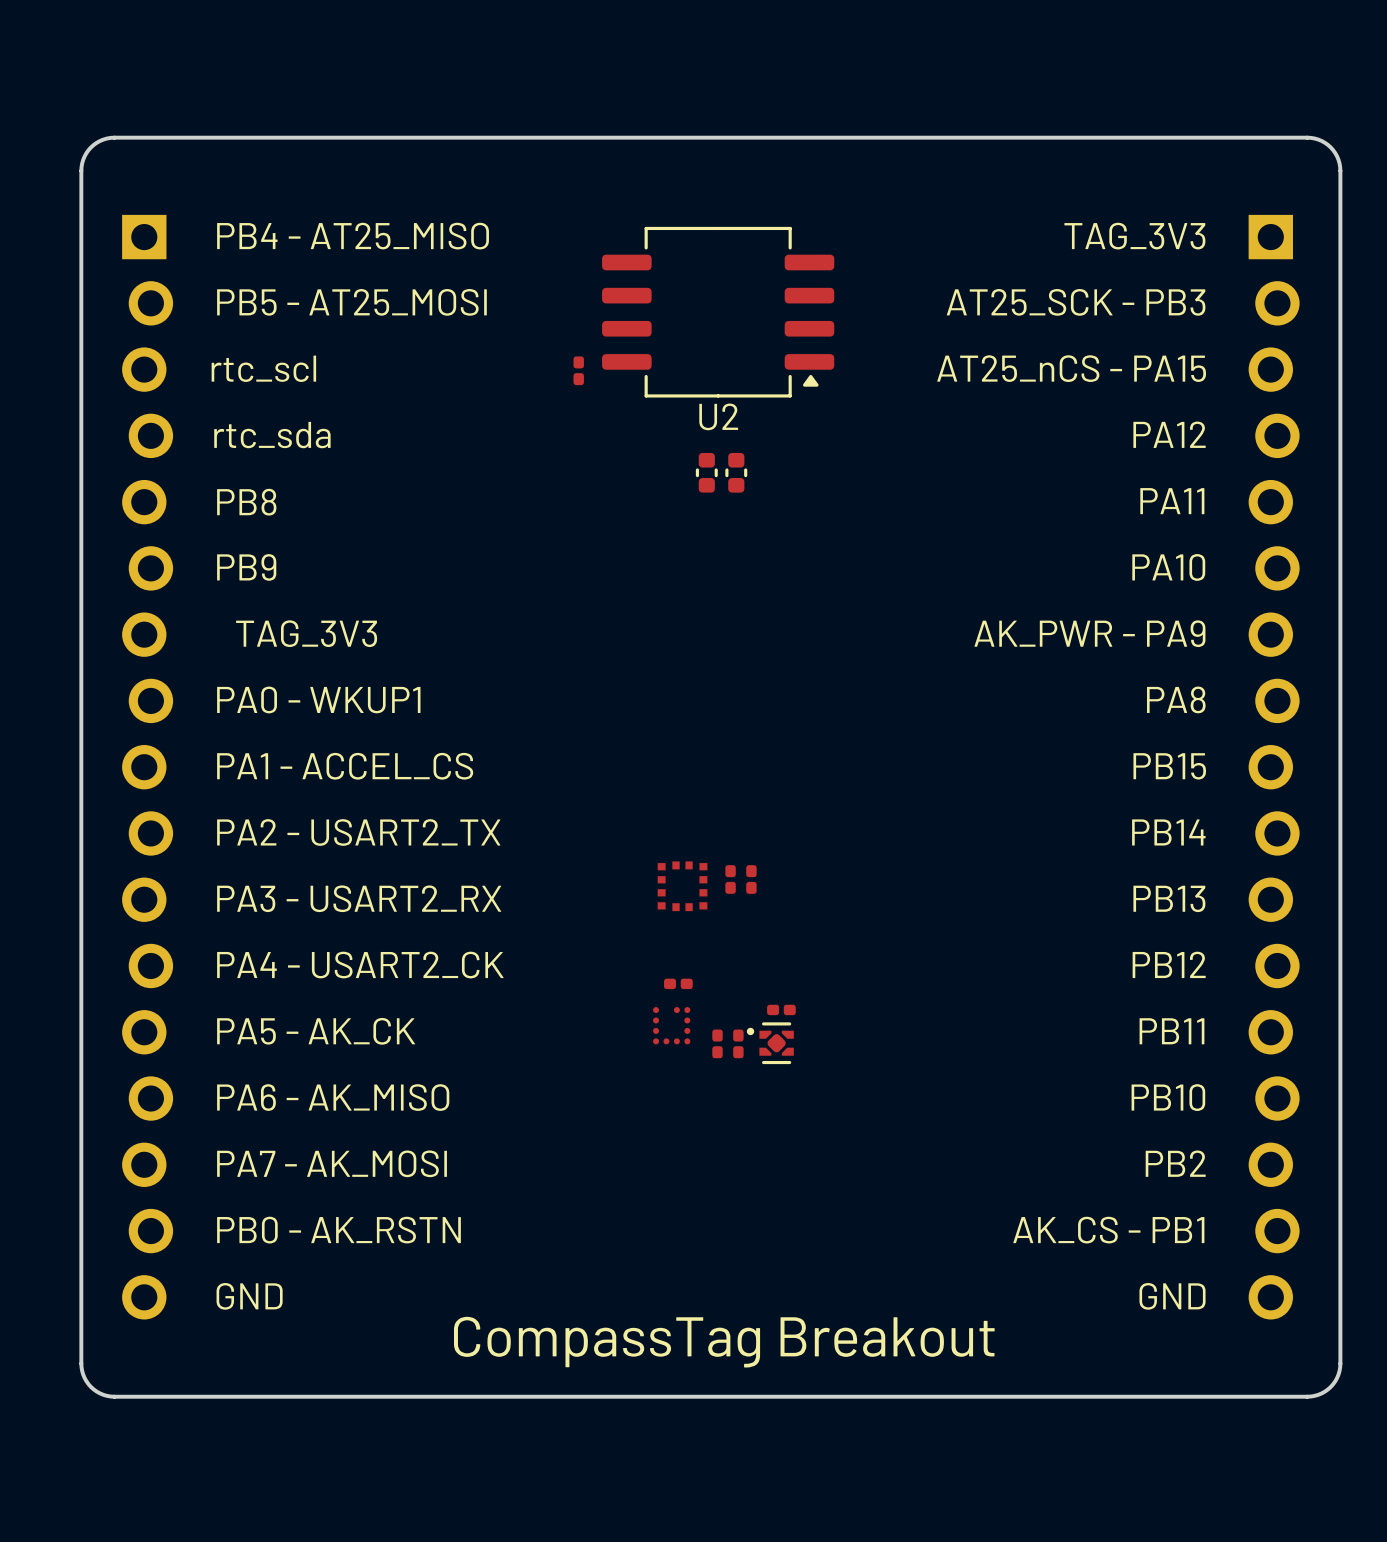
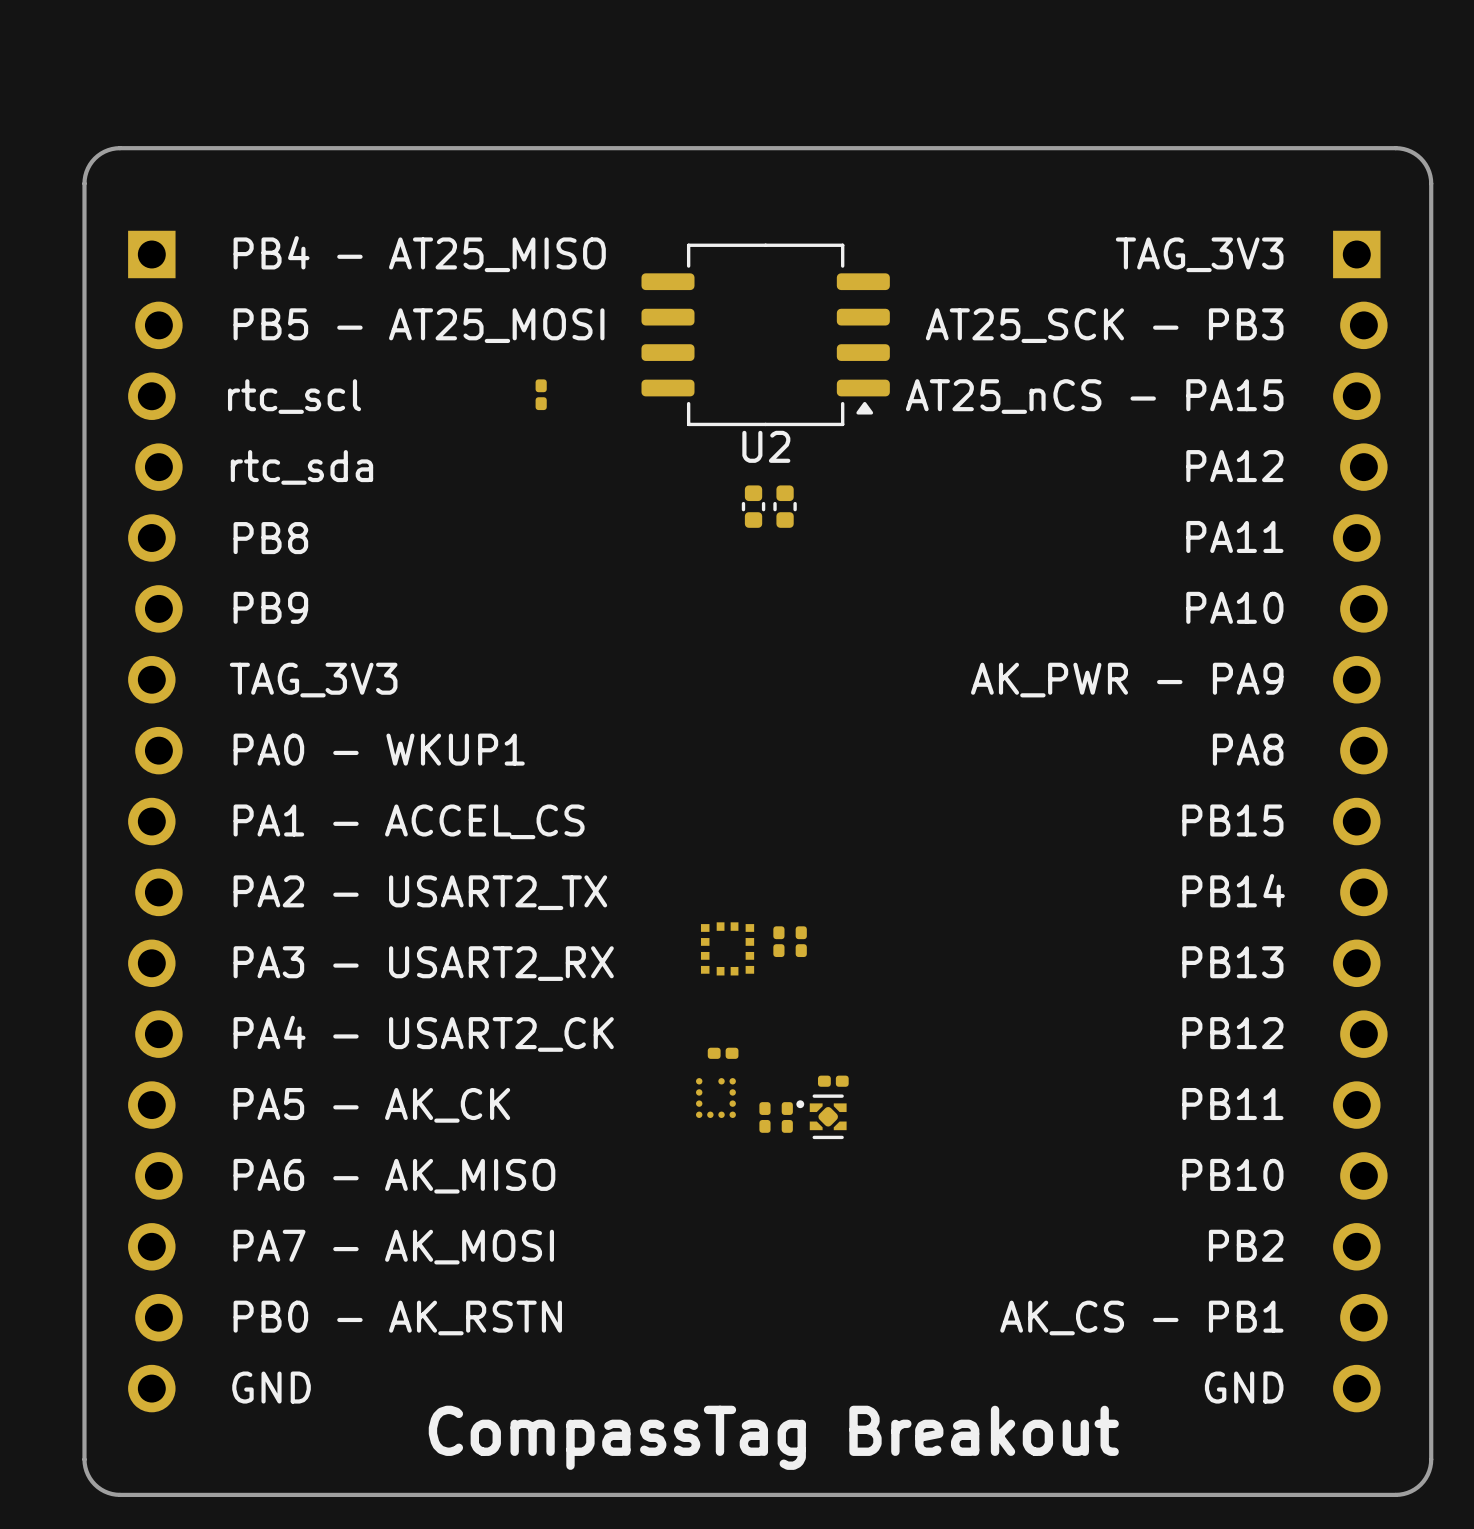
part position: (578, 370) -> (541, 394)

